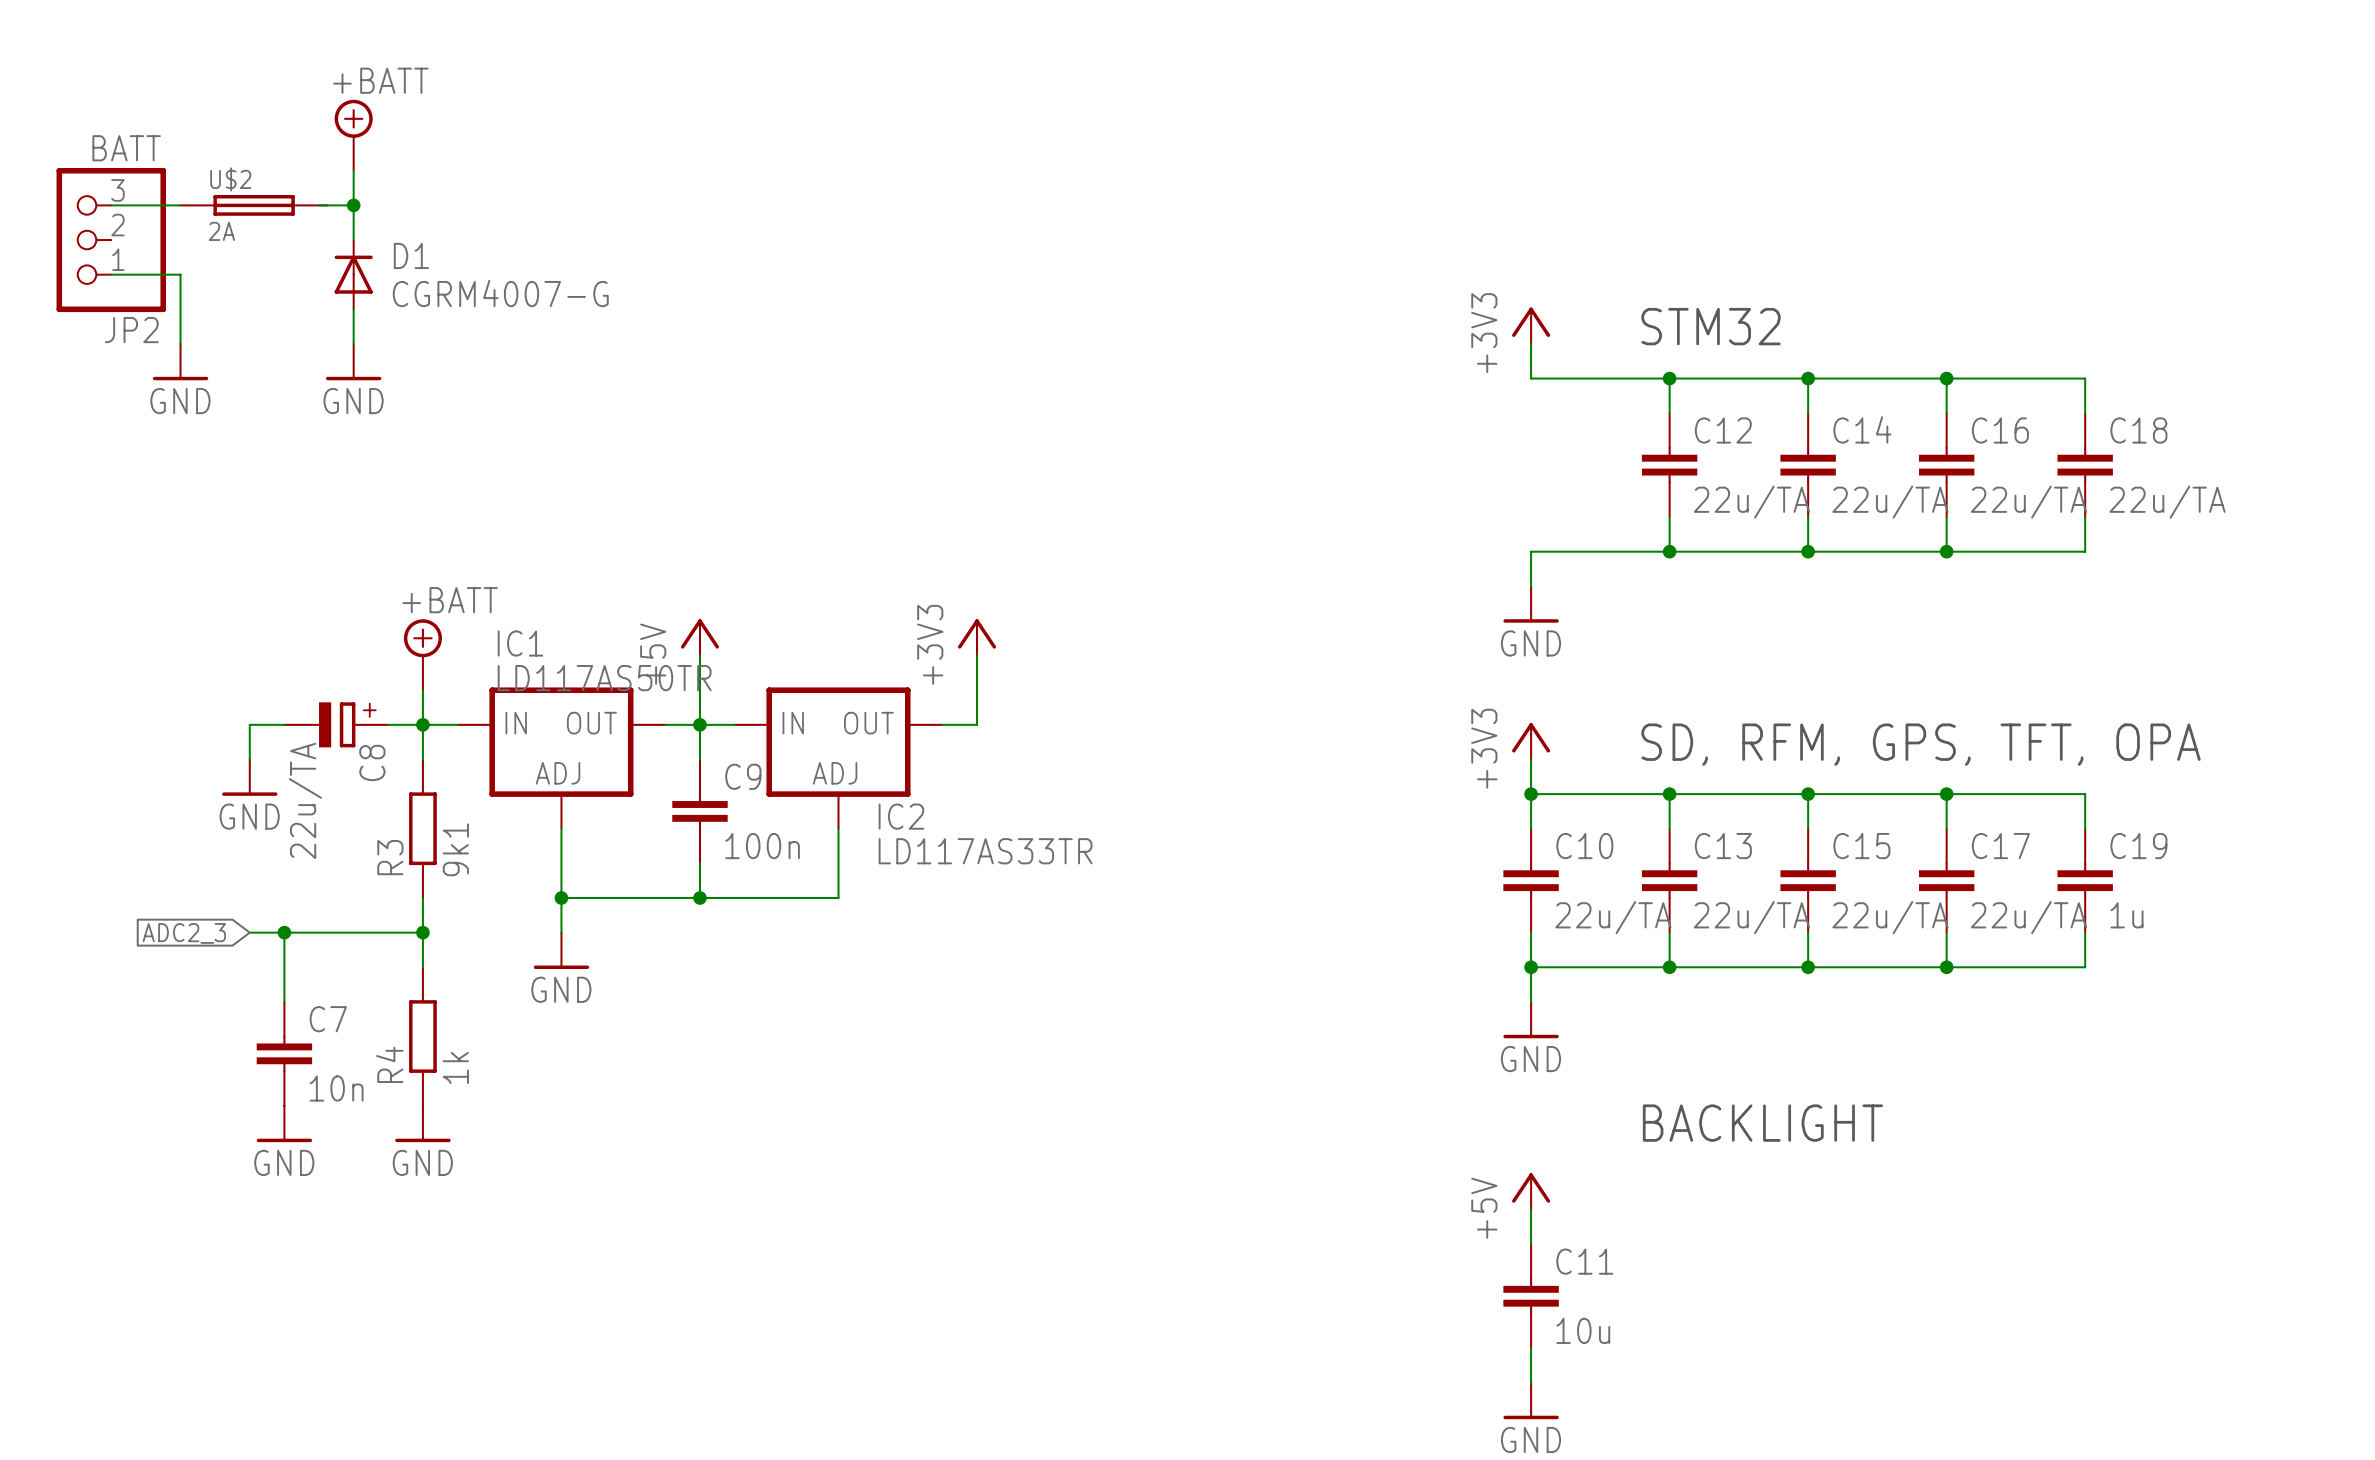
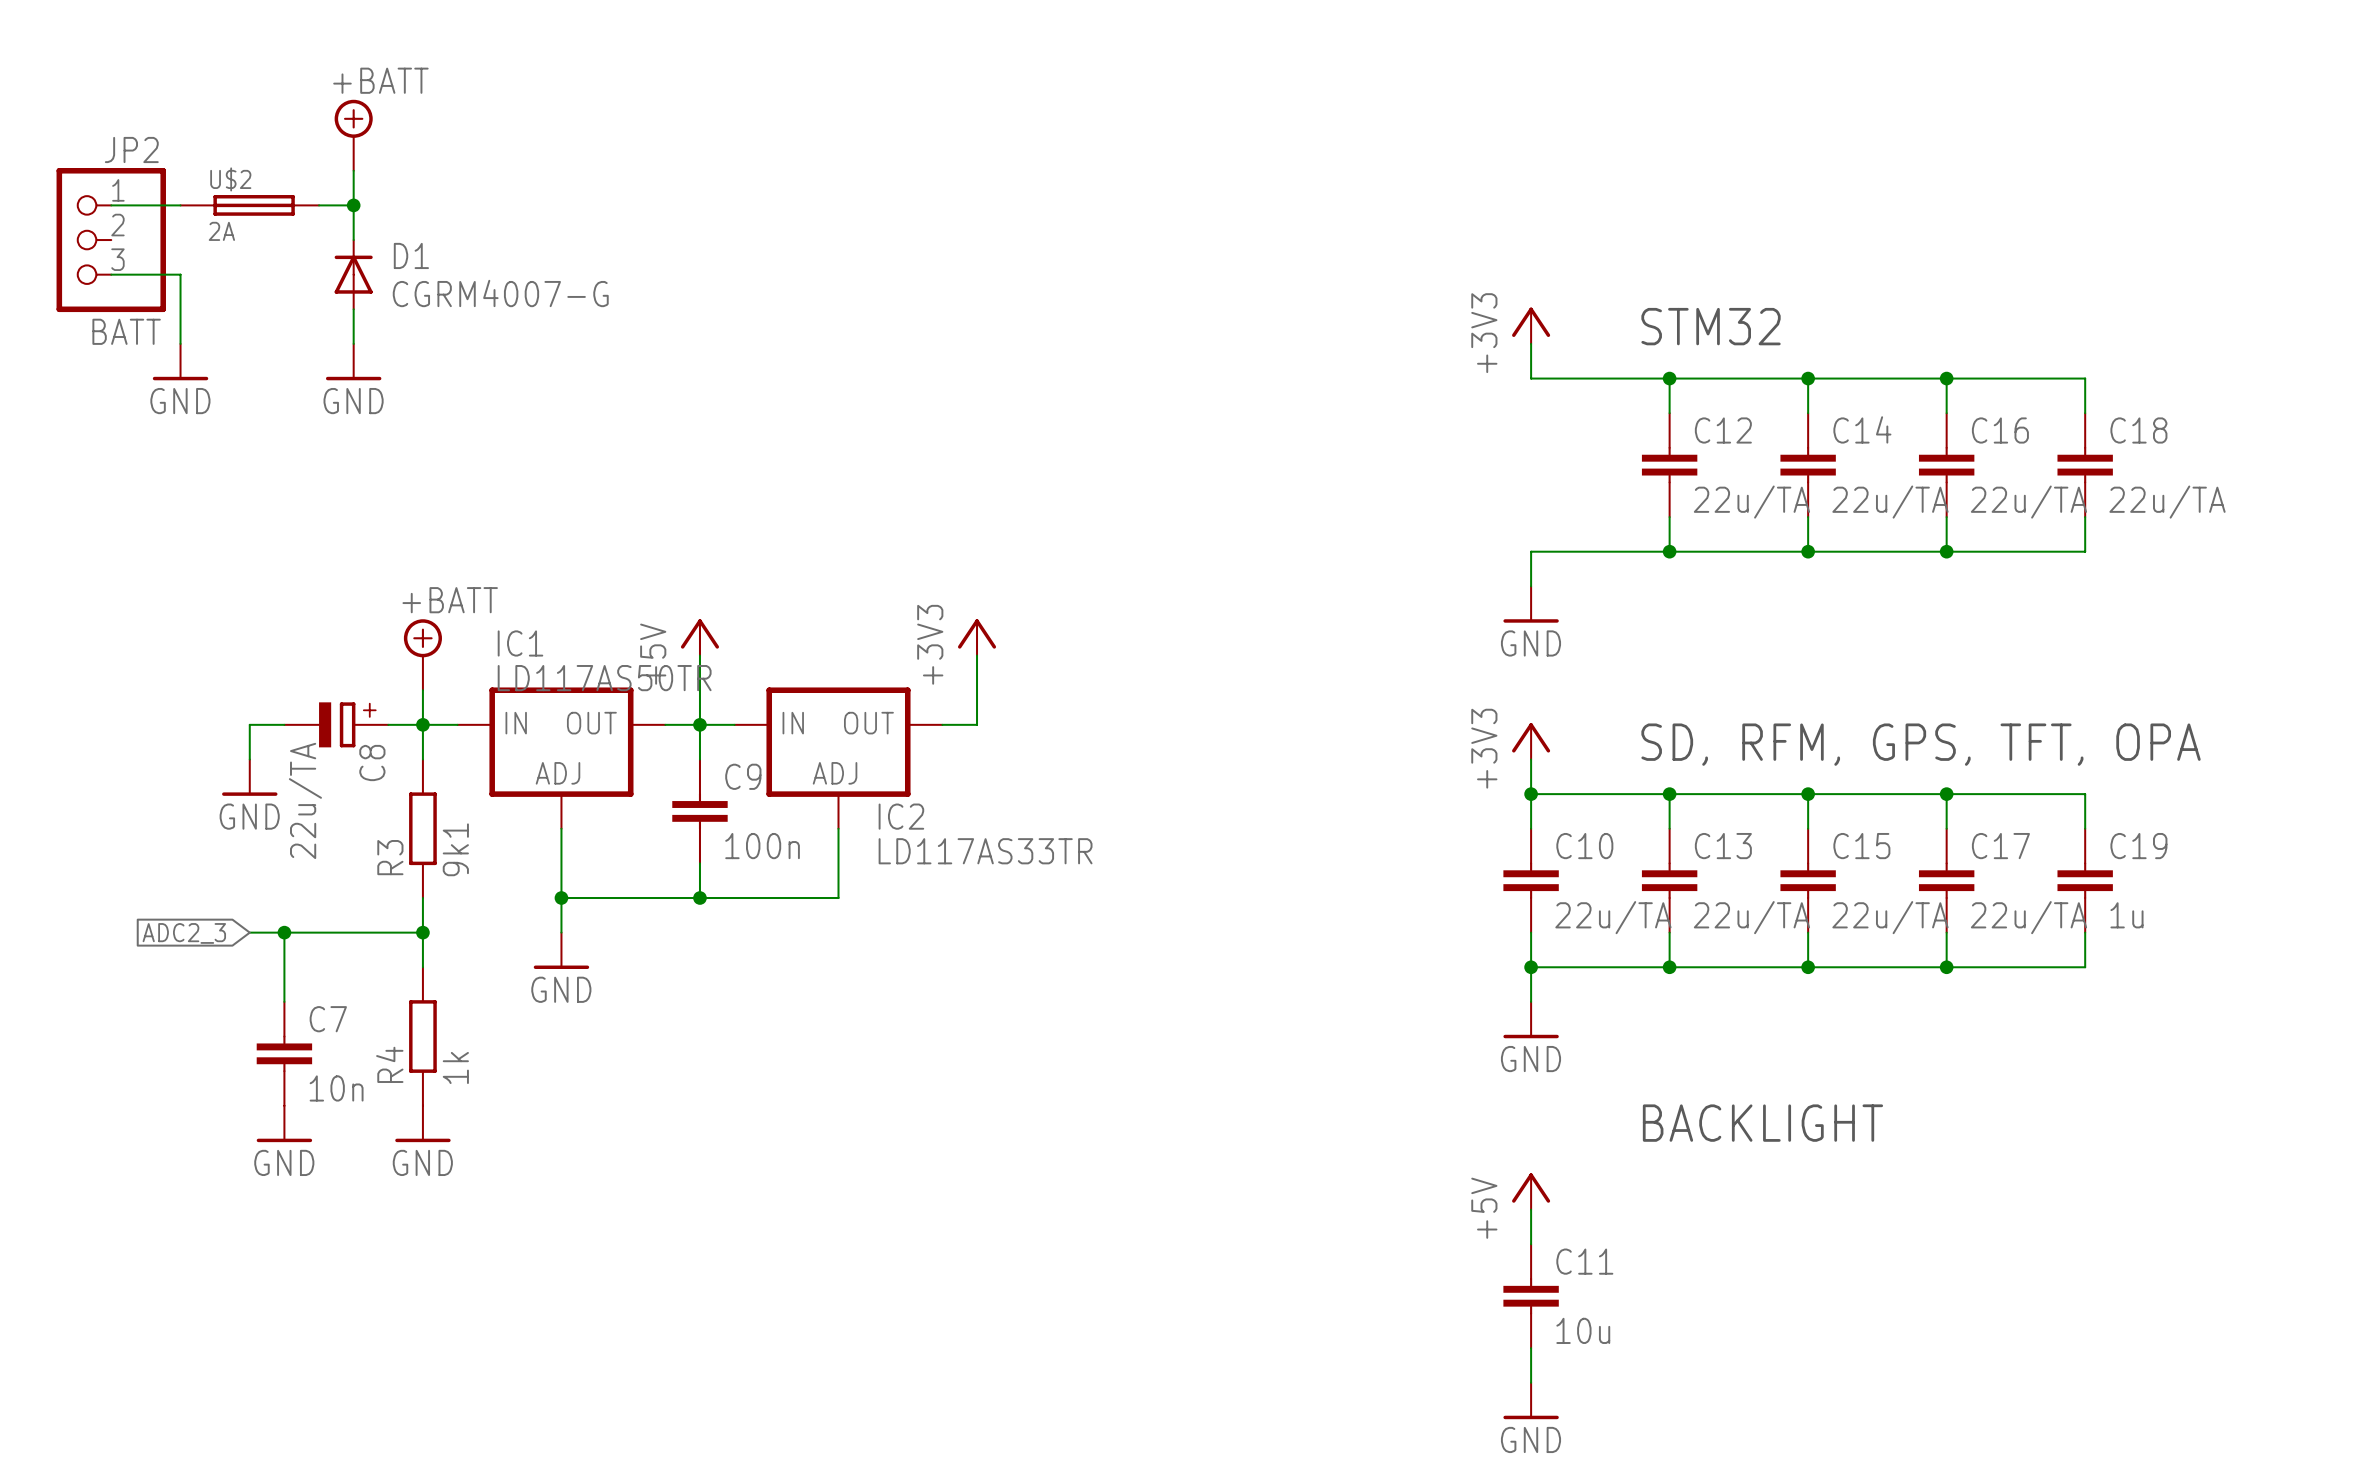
U$2 symbol: [180, 195, 328, 216] -> [180, 195, 320, 216]
JP2 flip: as is (111, 240) -> up-down (111, 240)

